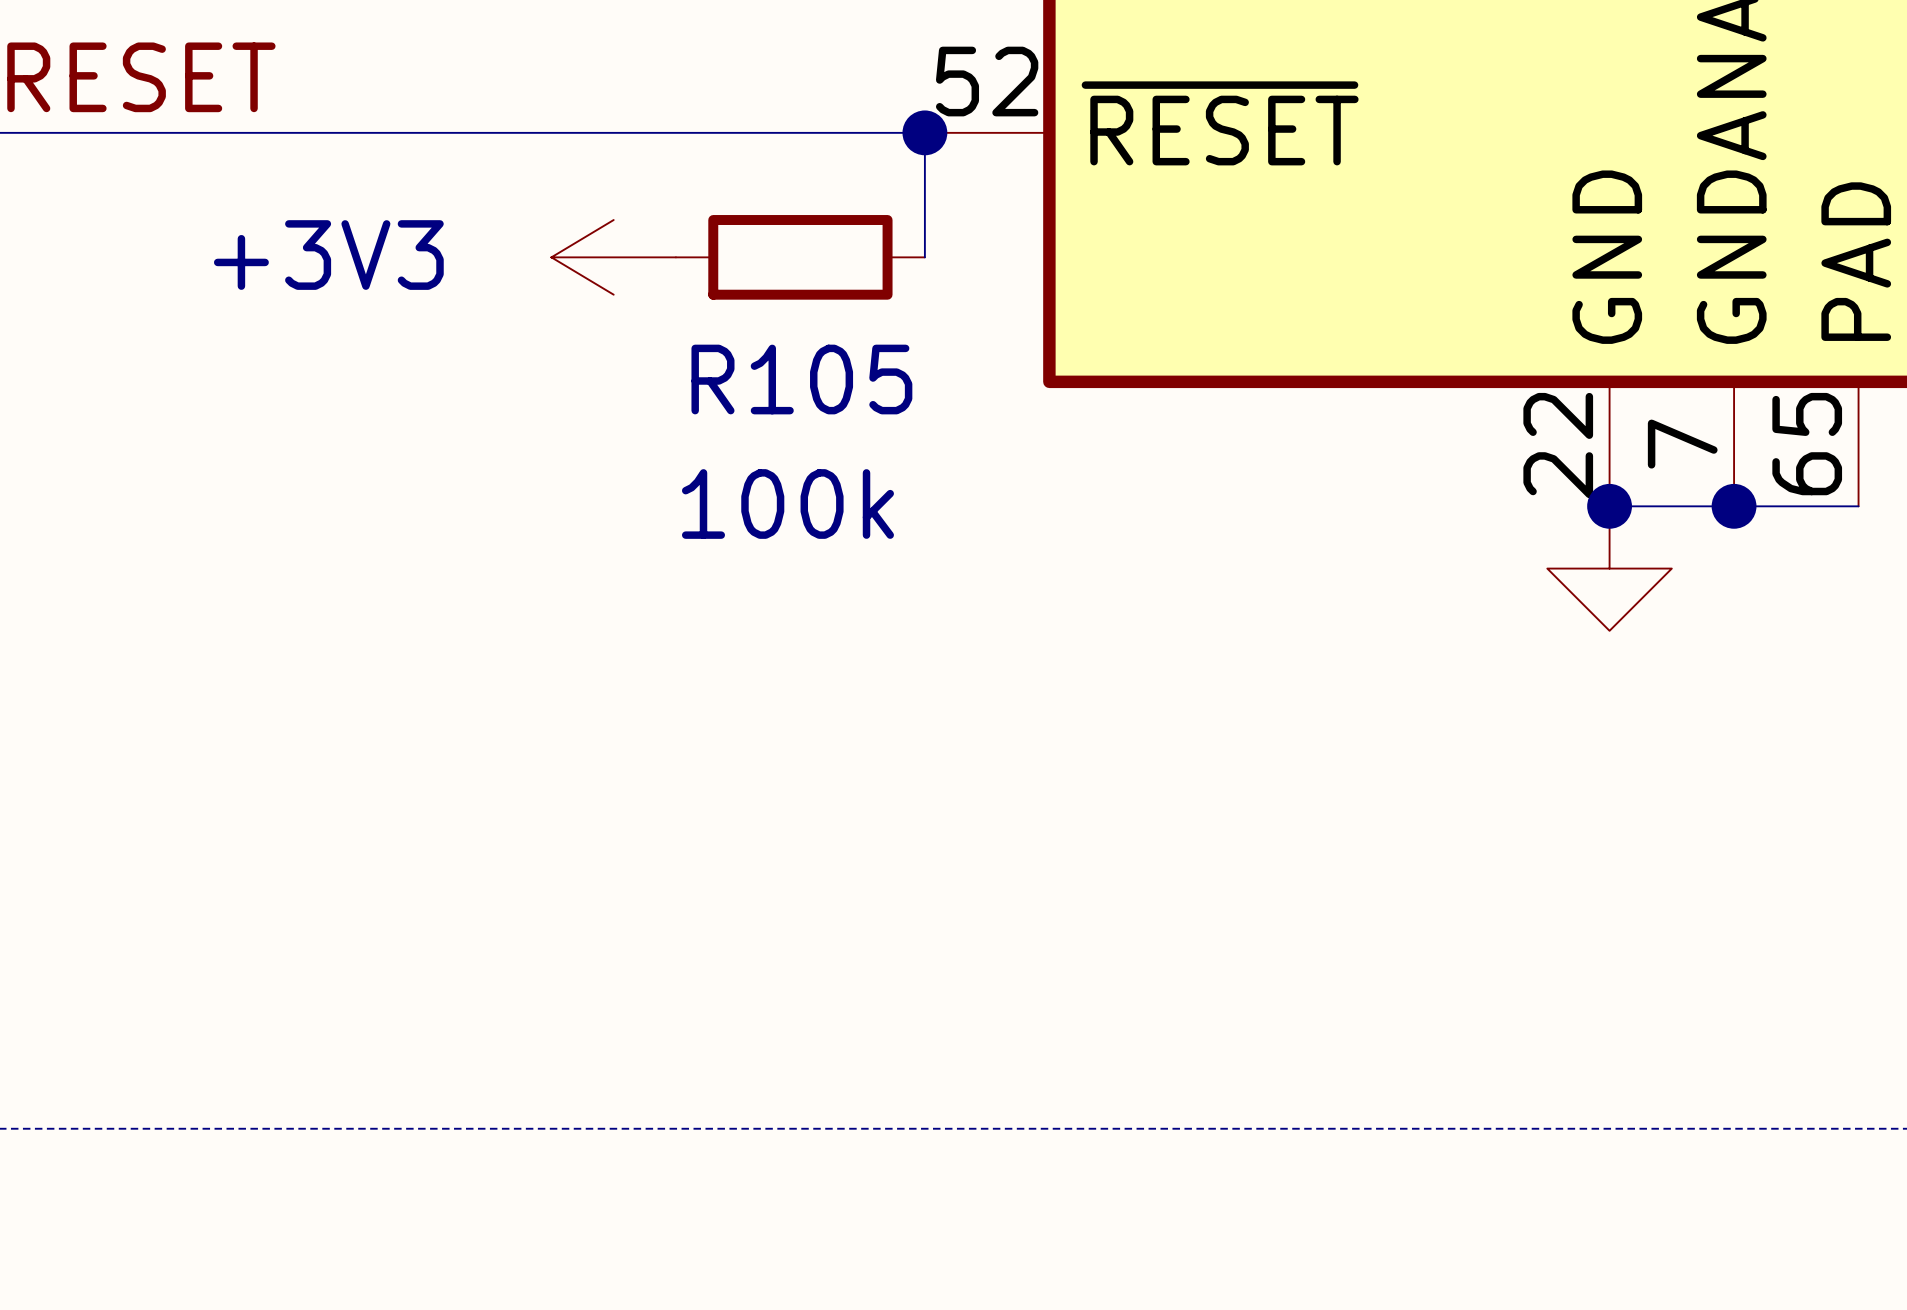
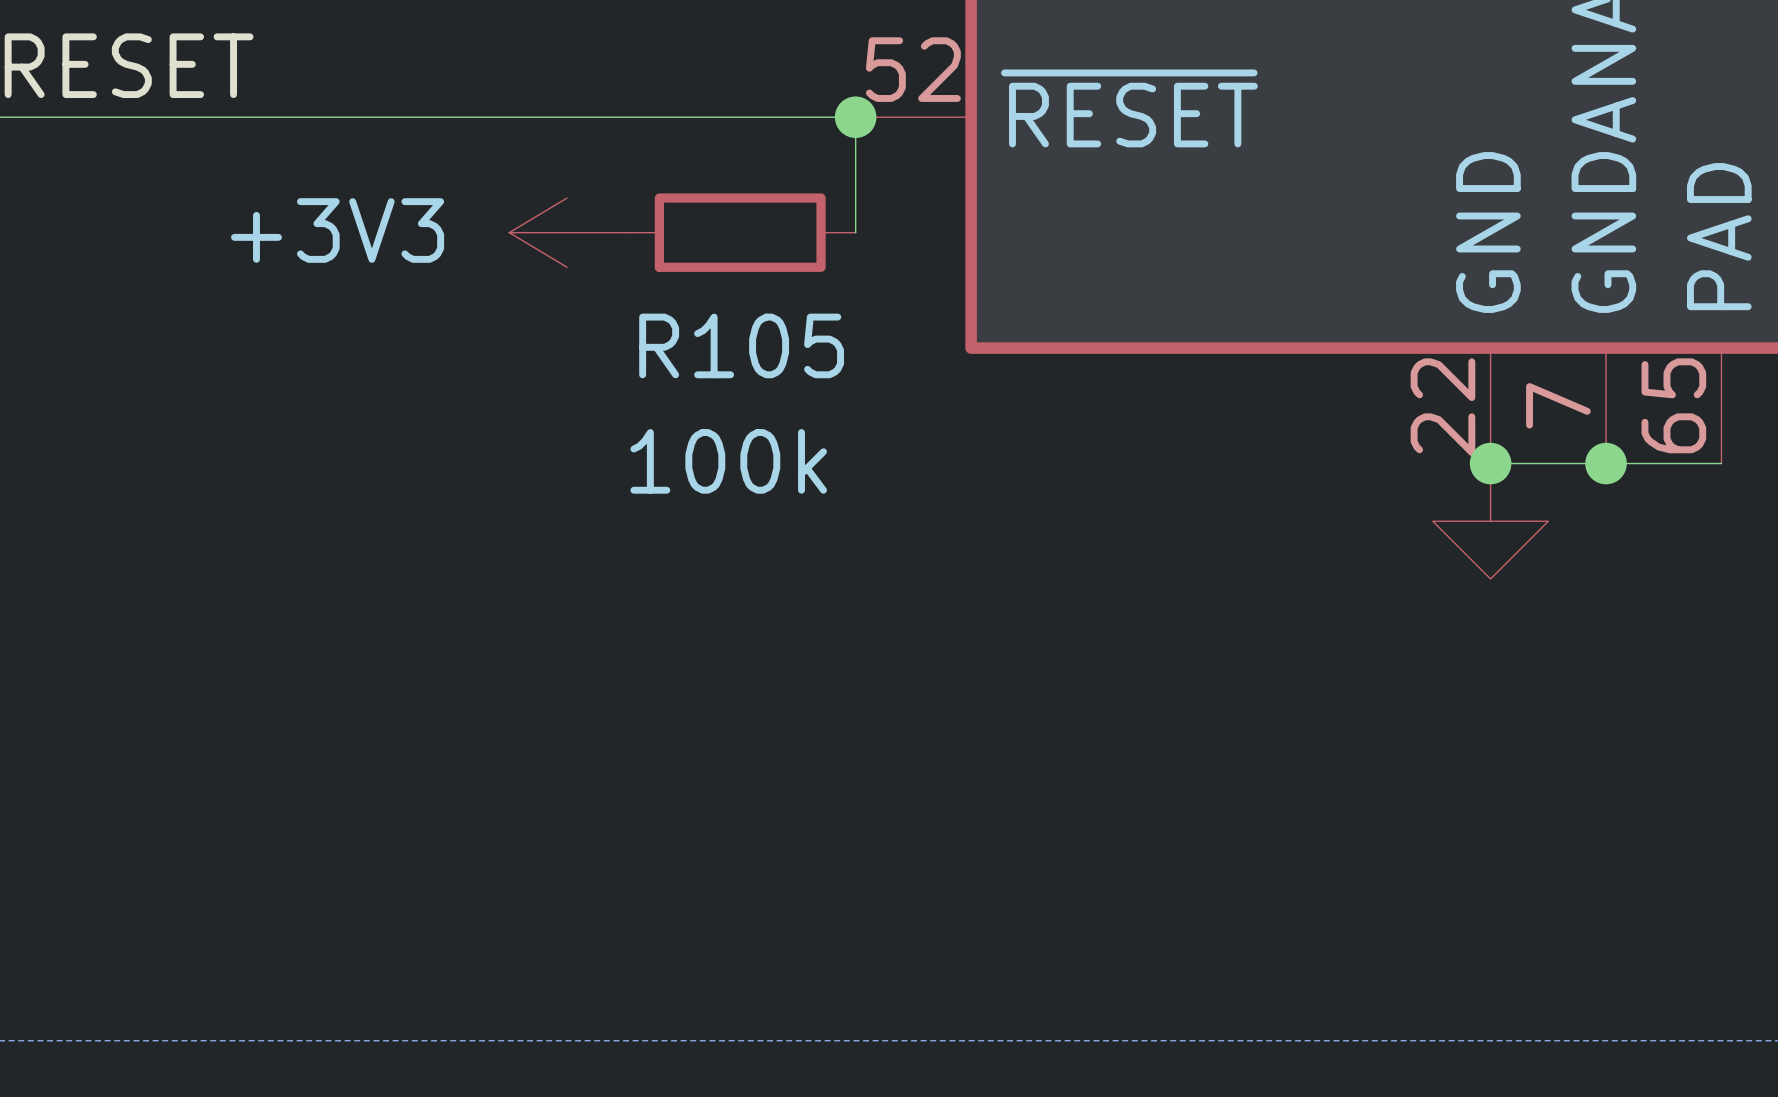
power symbol text position: +3V3 (328, 255) -> +3V3 (337, 230)

